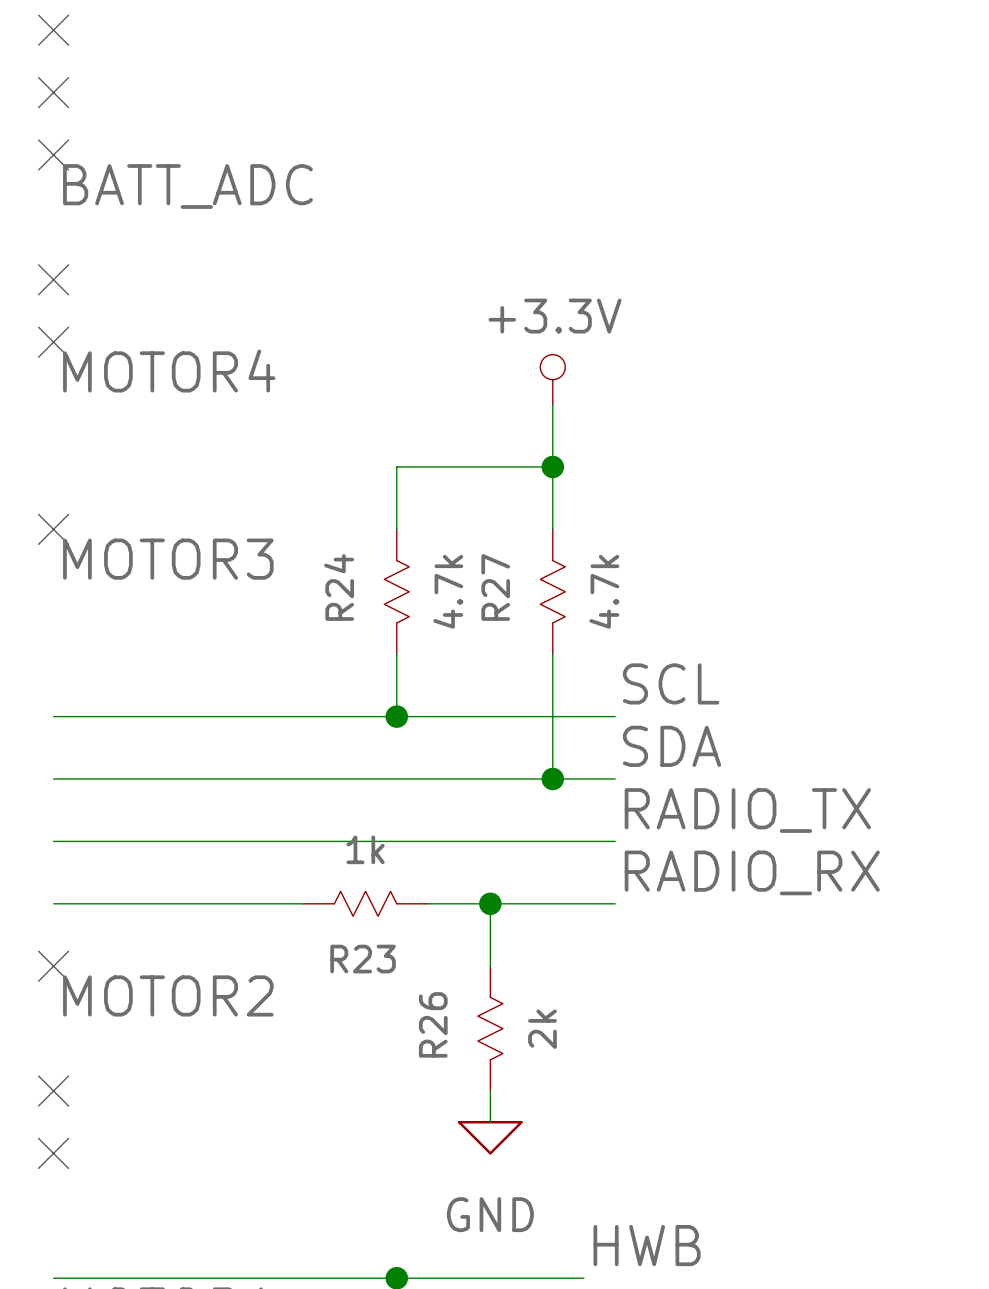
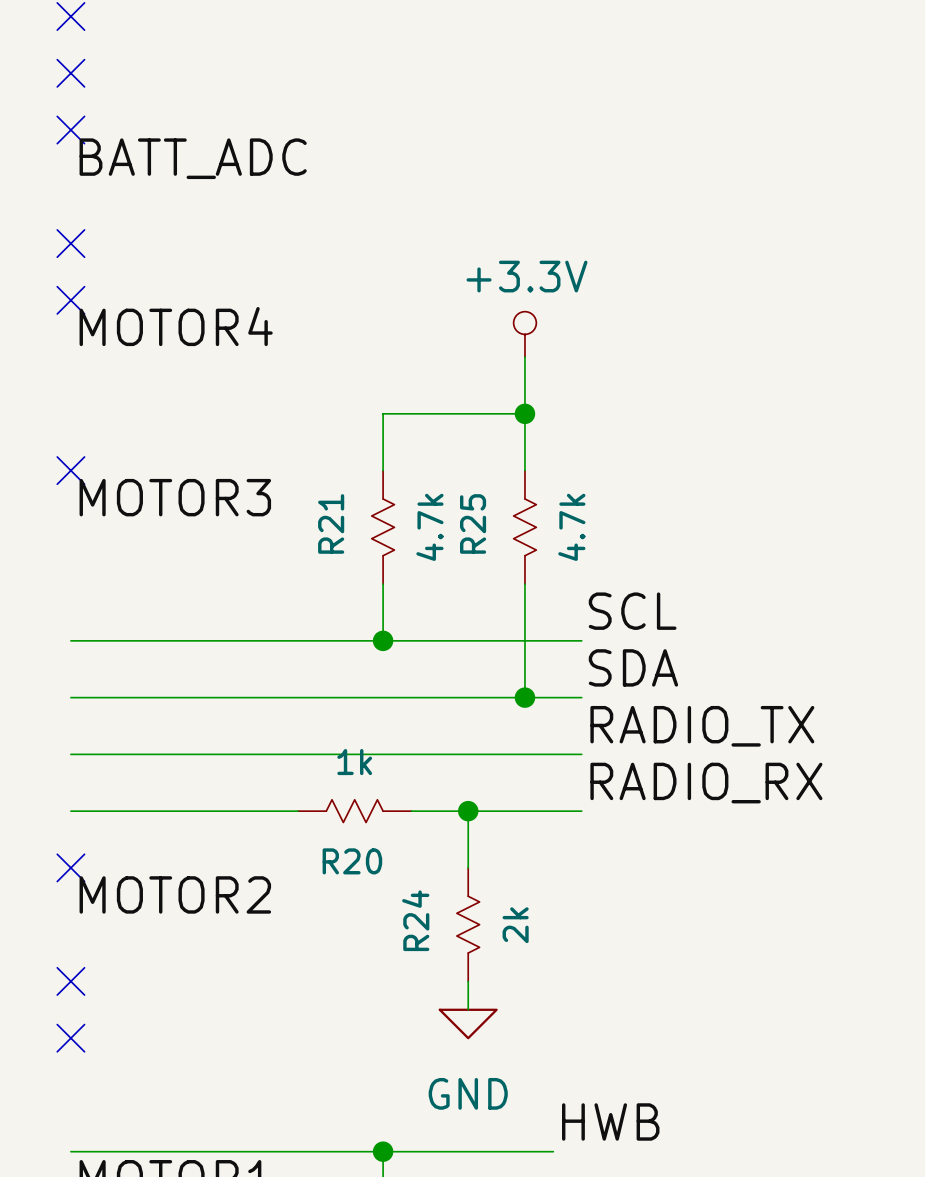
R24 name: R24 (339, 587) -> R21 (331, 523)
R27 name: R27 (495, 587) -> R25 (473, 523)
R23 name: R23 (363, 959) -> R20 (352, 861)
R26 name: R26 (433, 1024) -> R24 (415, 920)

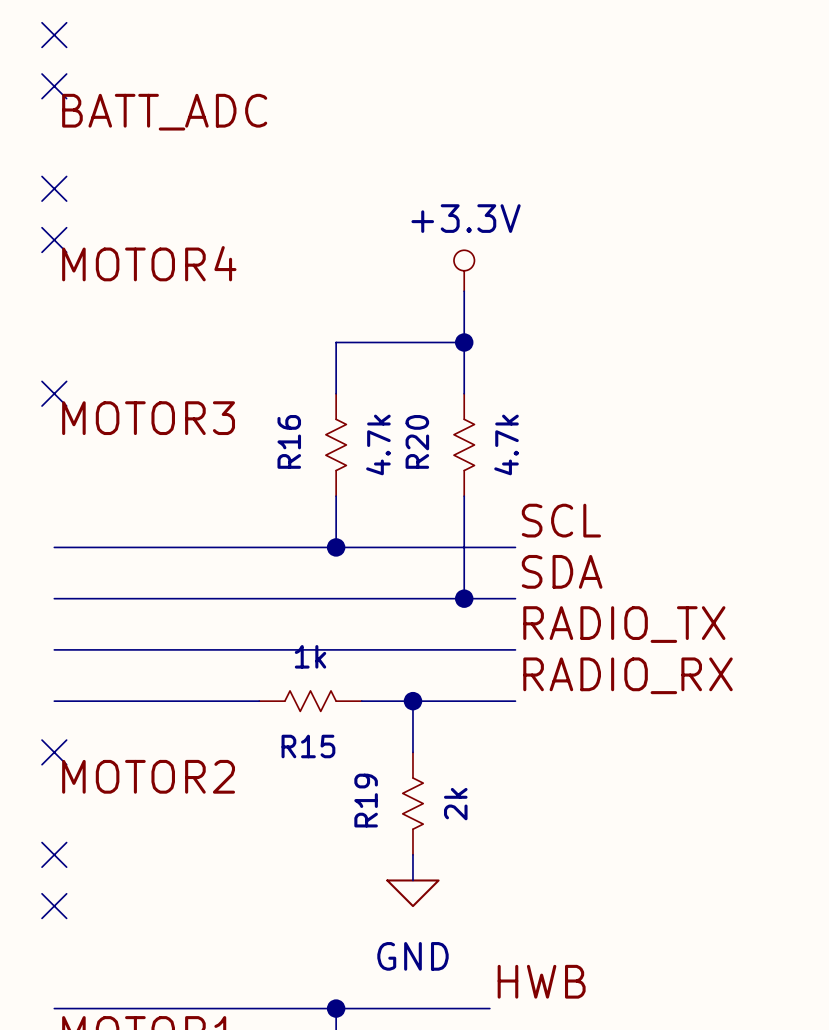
R21 name: R21 (331, 523) -> R16 (289, 441)
R25 name: R25 (473, 523) -> R20 (417, 441)
R20 name: R20 (352, 861) -> R15 (308, 746)
R24 name: R24 (415, 920) -> R19 (366, 800)

